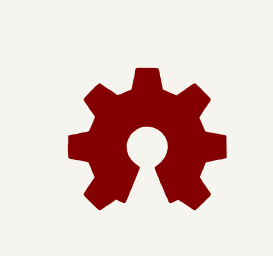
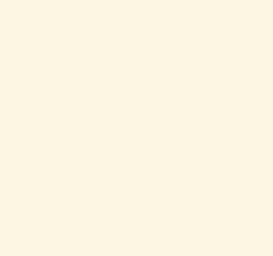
part: (147, 139) -> none

